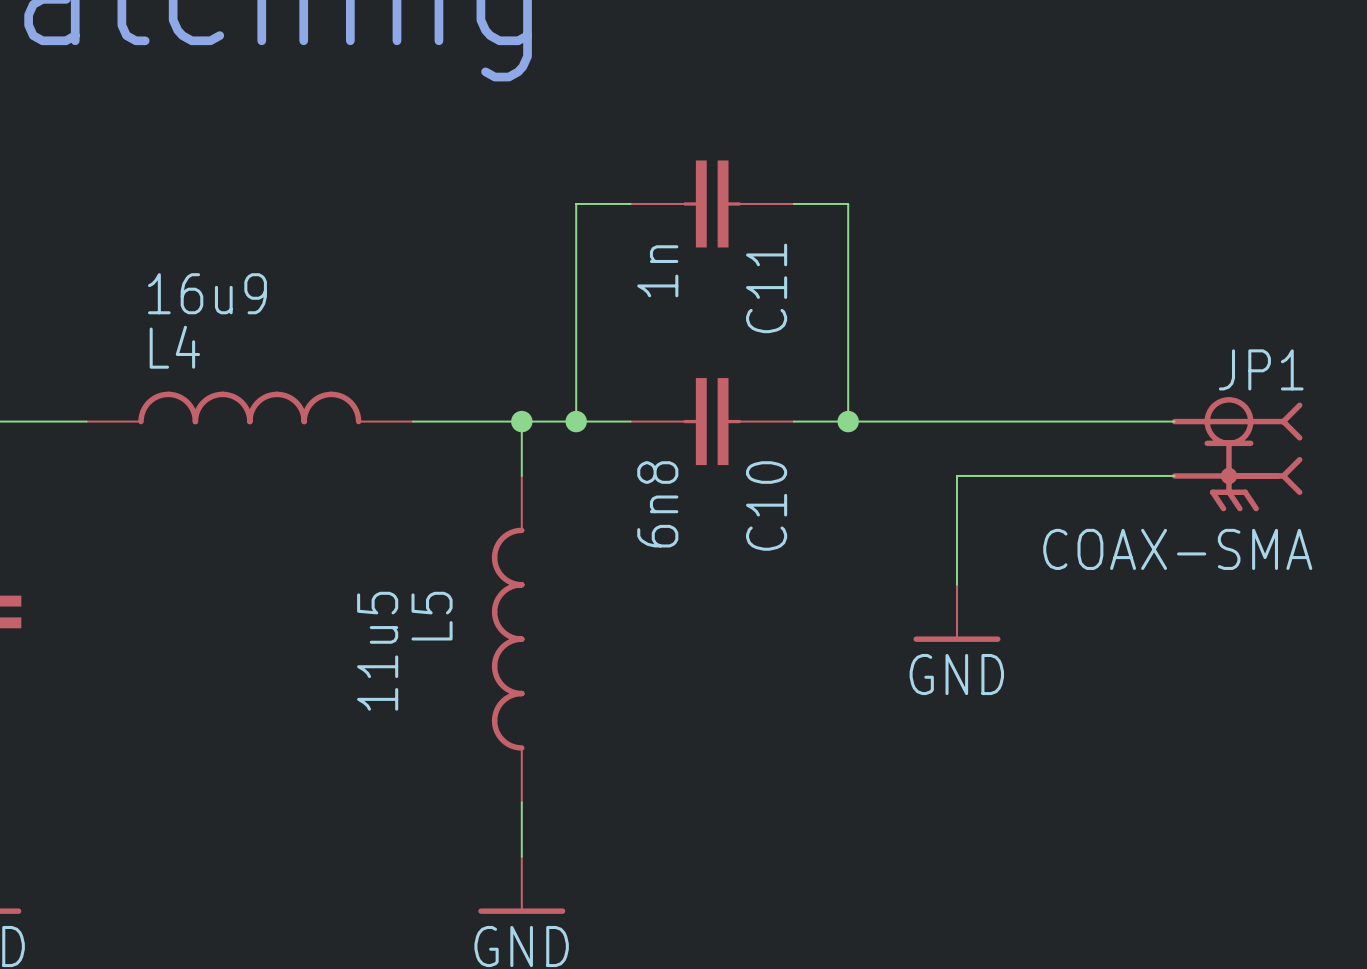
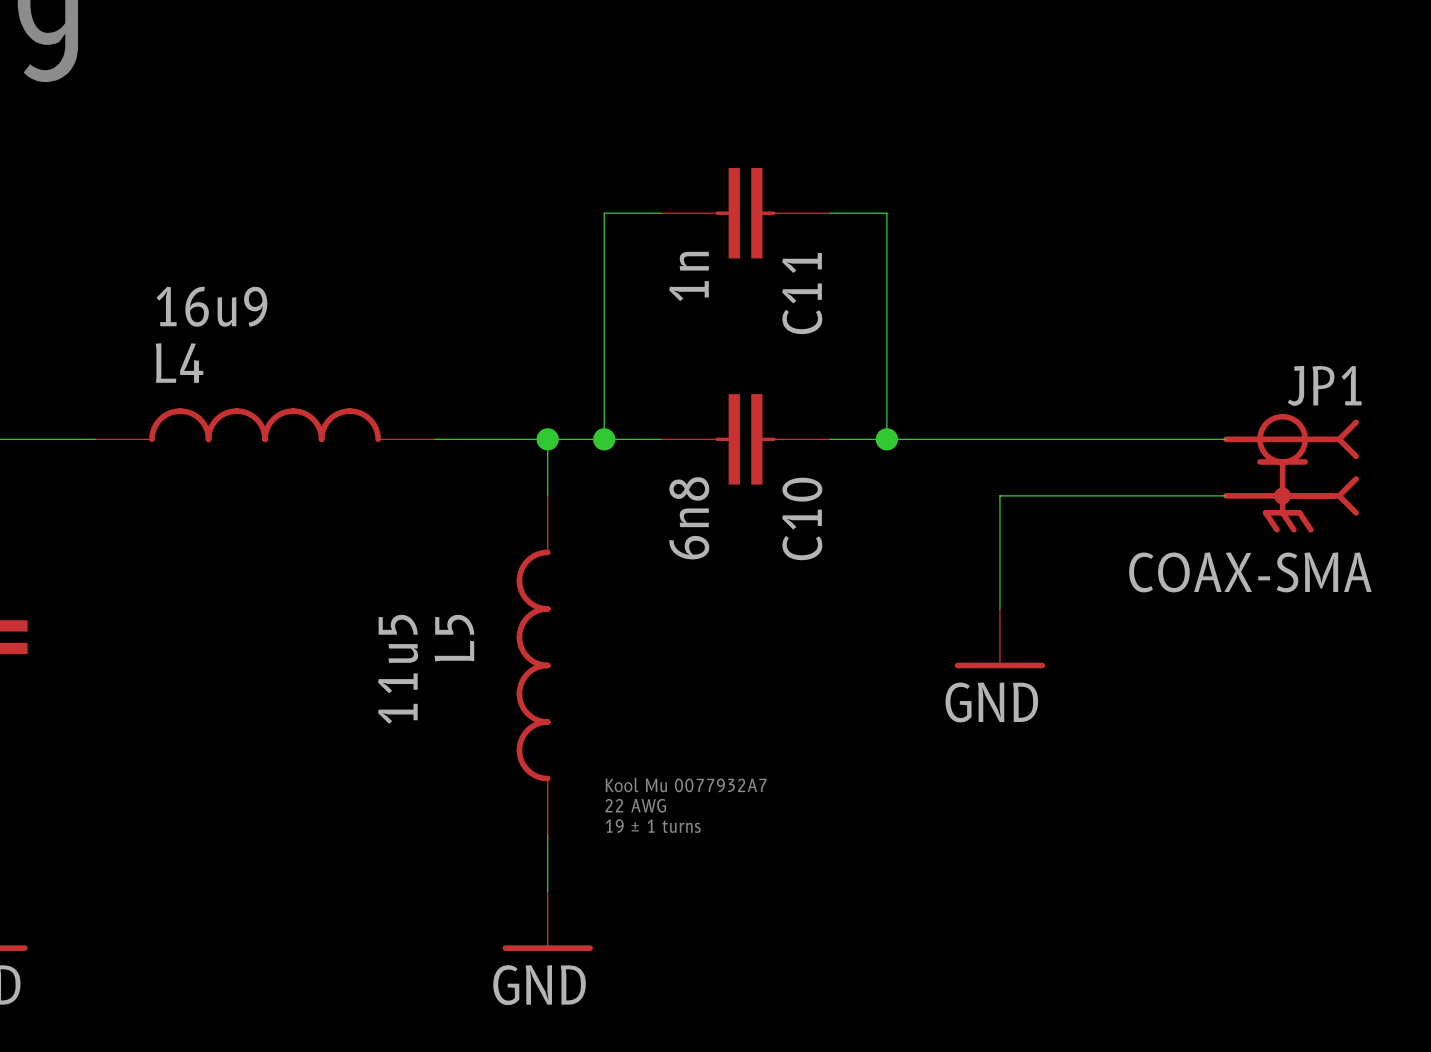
text: none -> Kool Mu 0077932A7 (686, 784)
text: none -> 22 AWG (635, 805)
text: none -> 19 ± 1 turns (653, 826)

